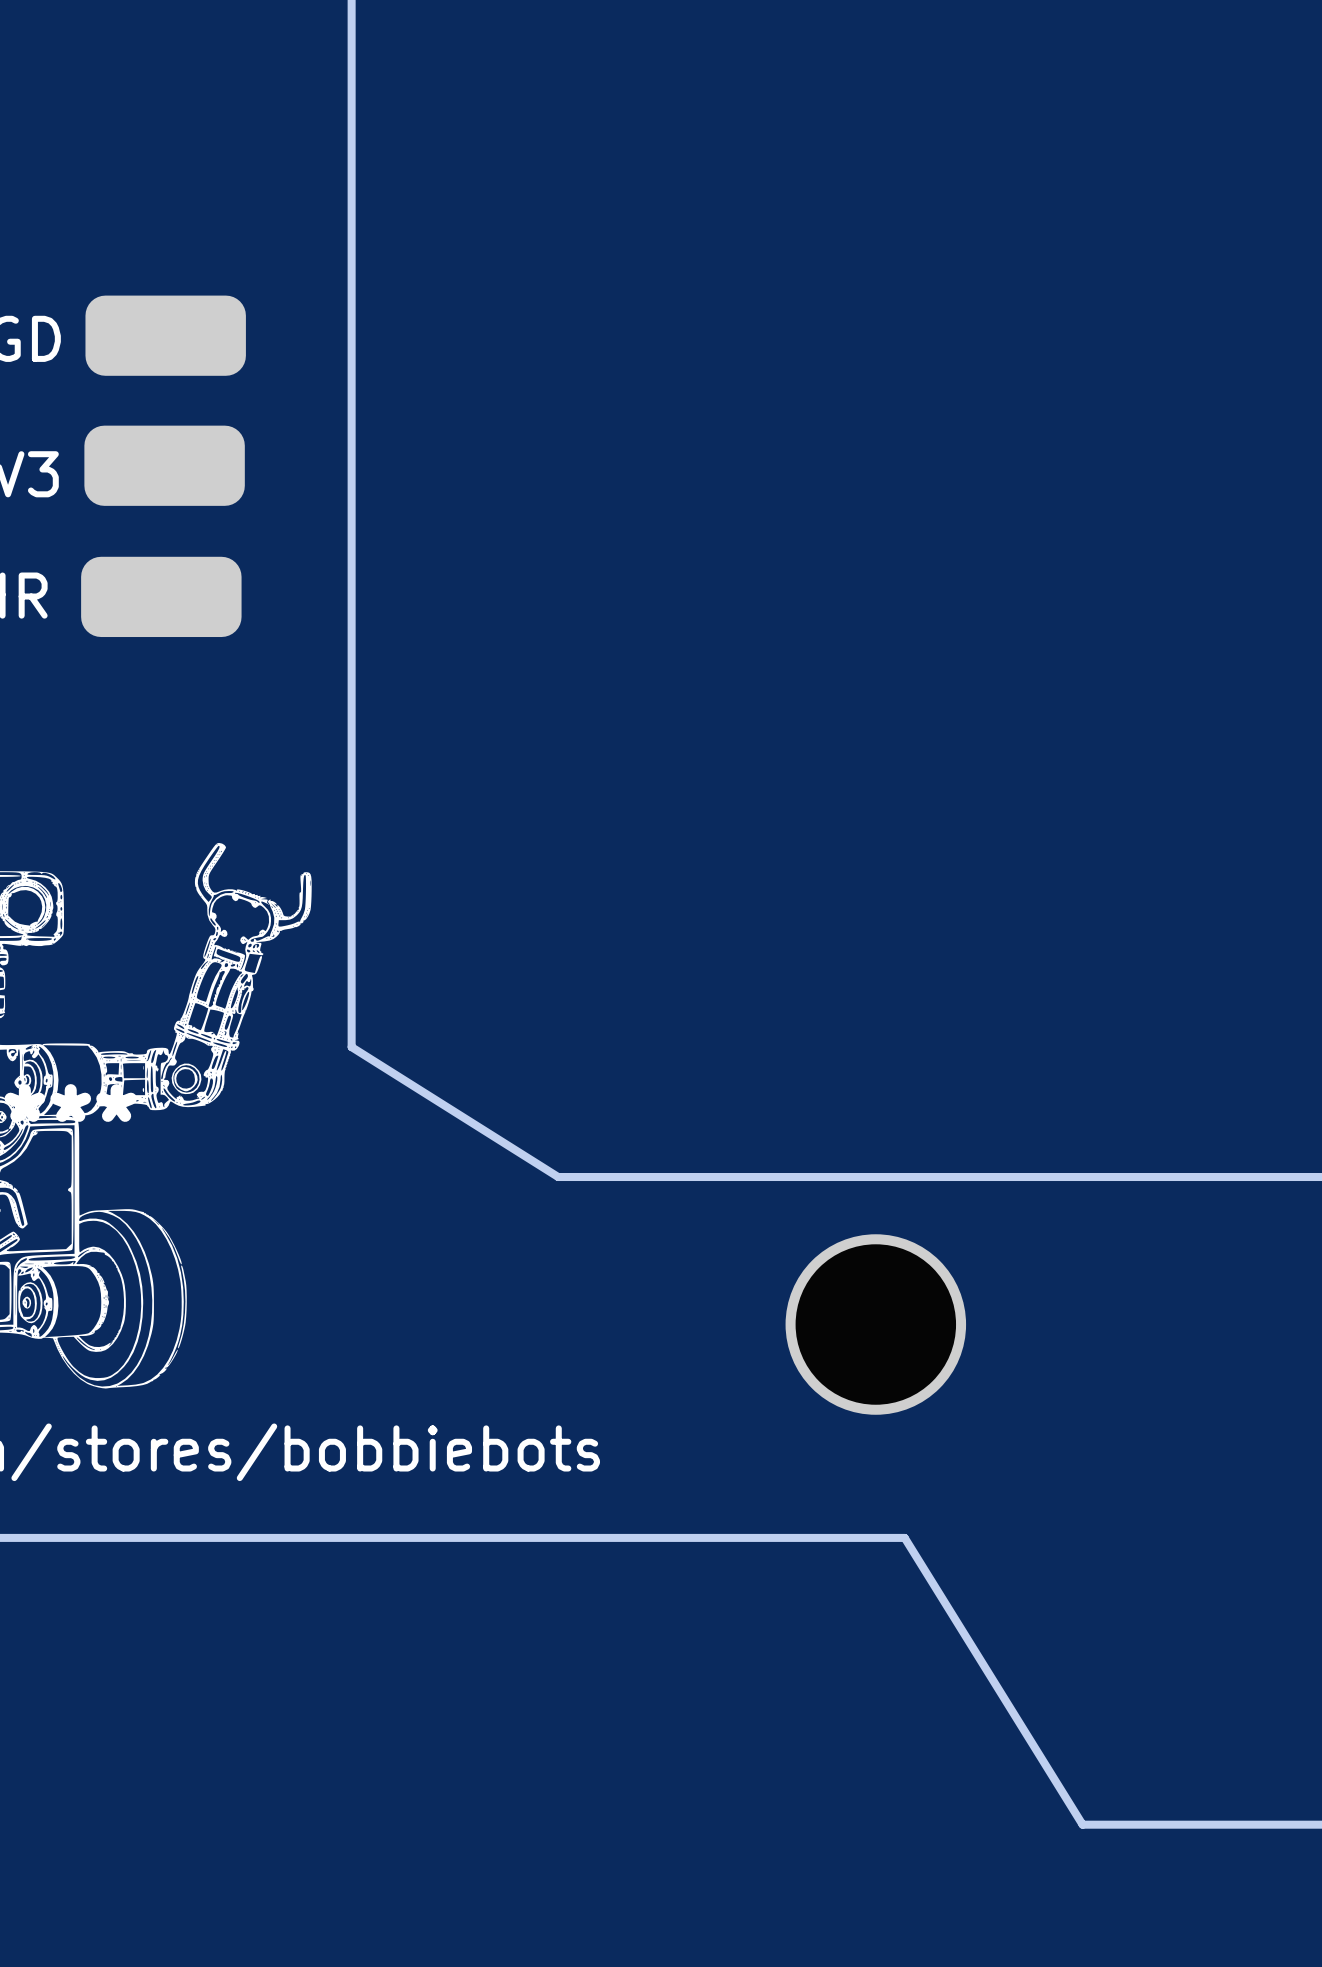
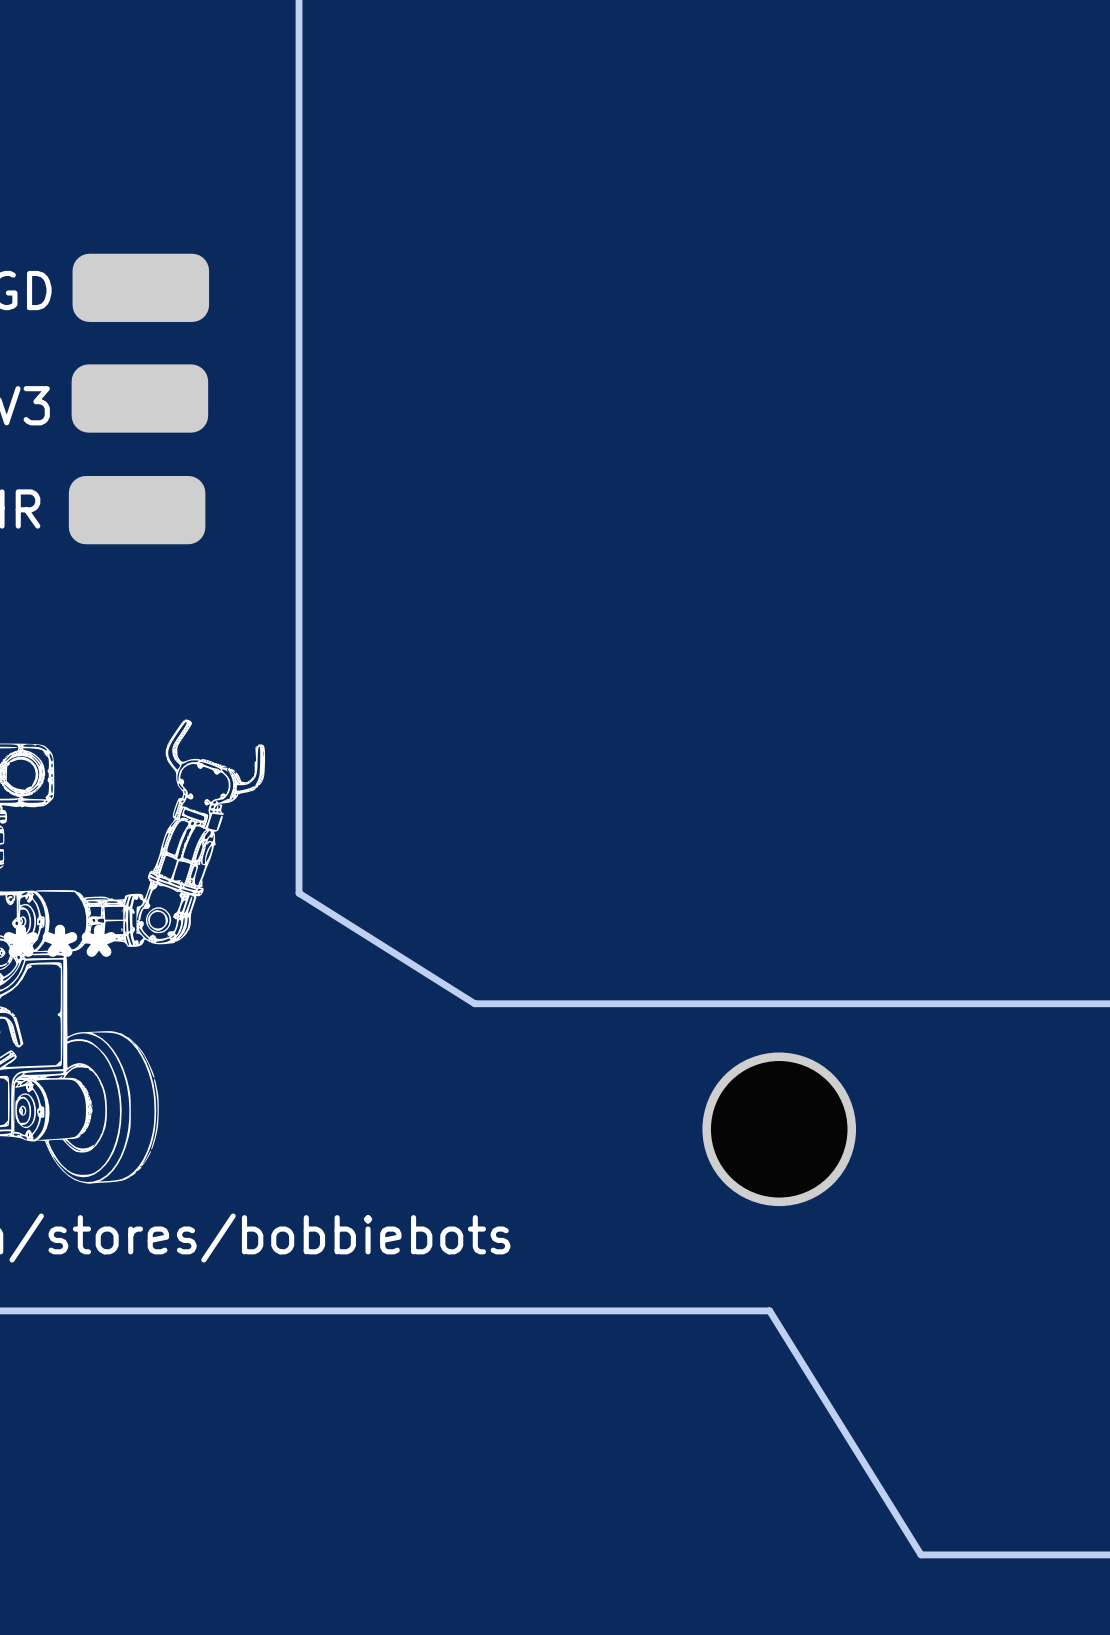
part position: (875, 1324) -> (779, 1129)

